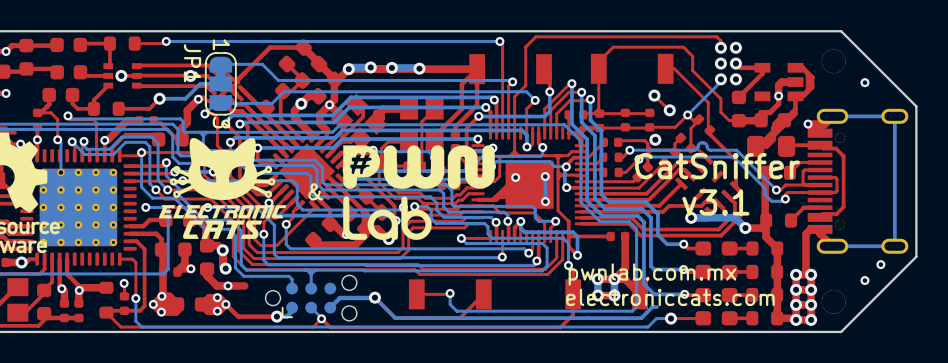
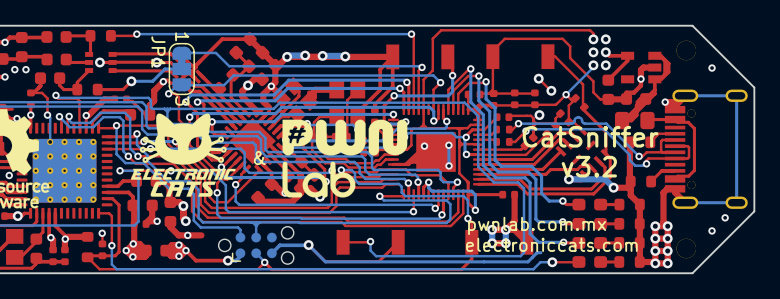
via: none -> (14, 69)
via: none -> (25, 69)
text: v3.1 (715, 202) -> v3.2 (589, 166)
via: none -> (9, 175)

